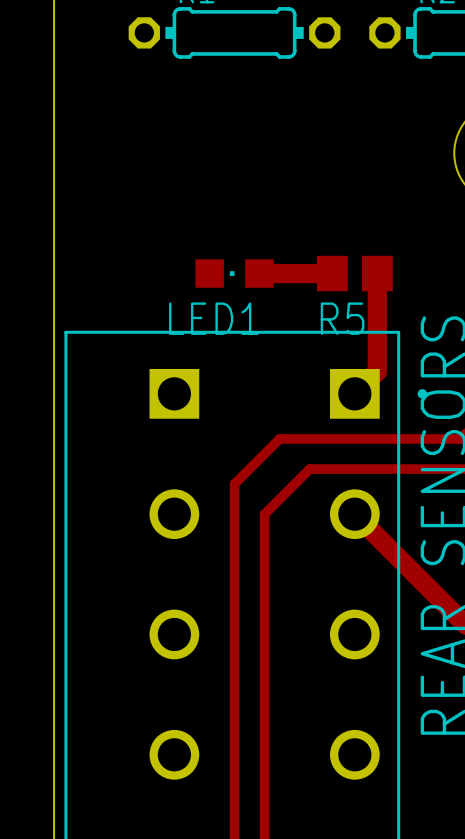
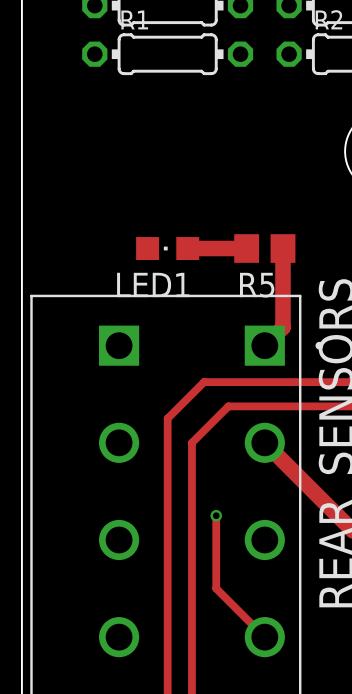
track: none -> (216, 515) (216, 588) (264, 637)
via: none -> (216, 515)

